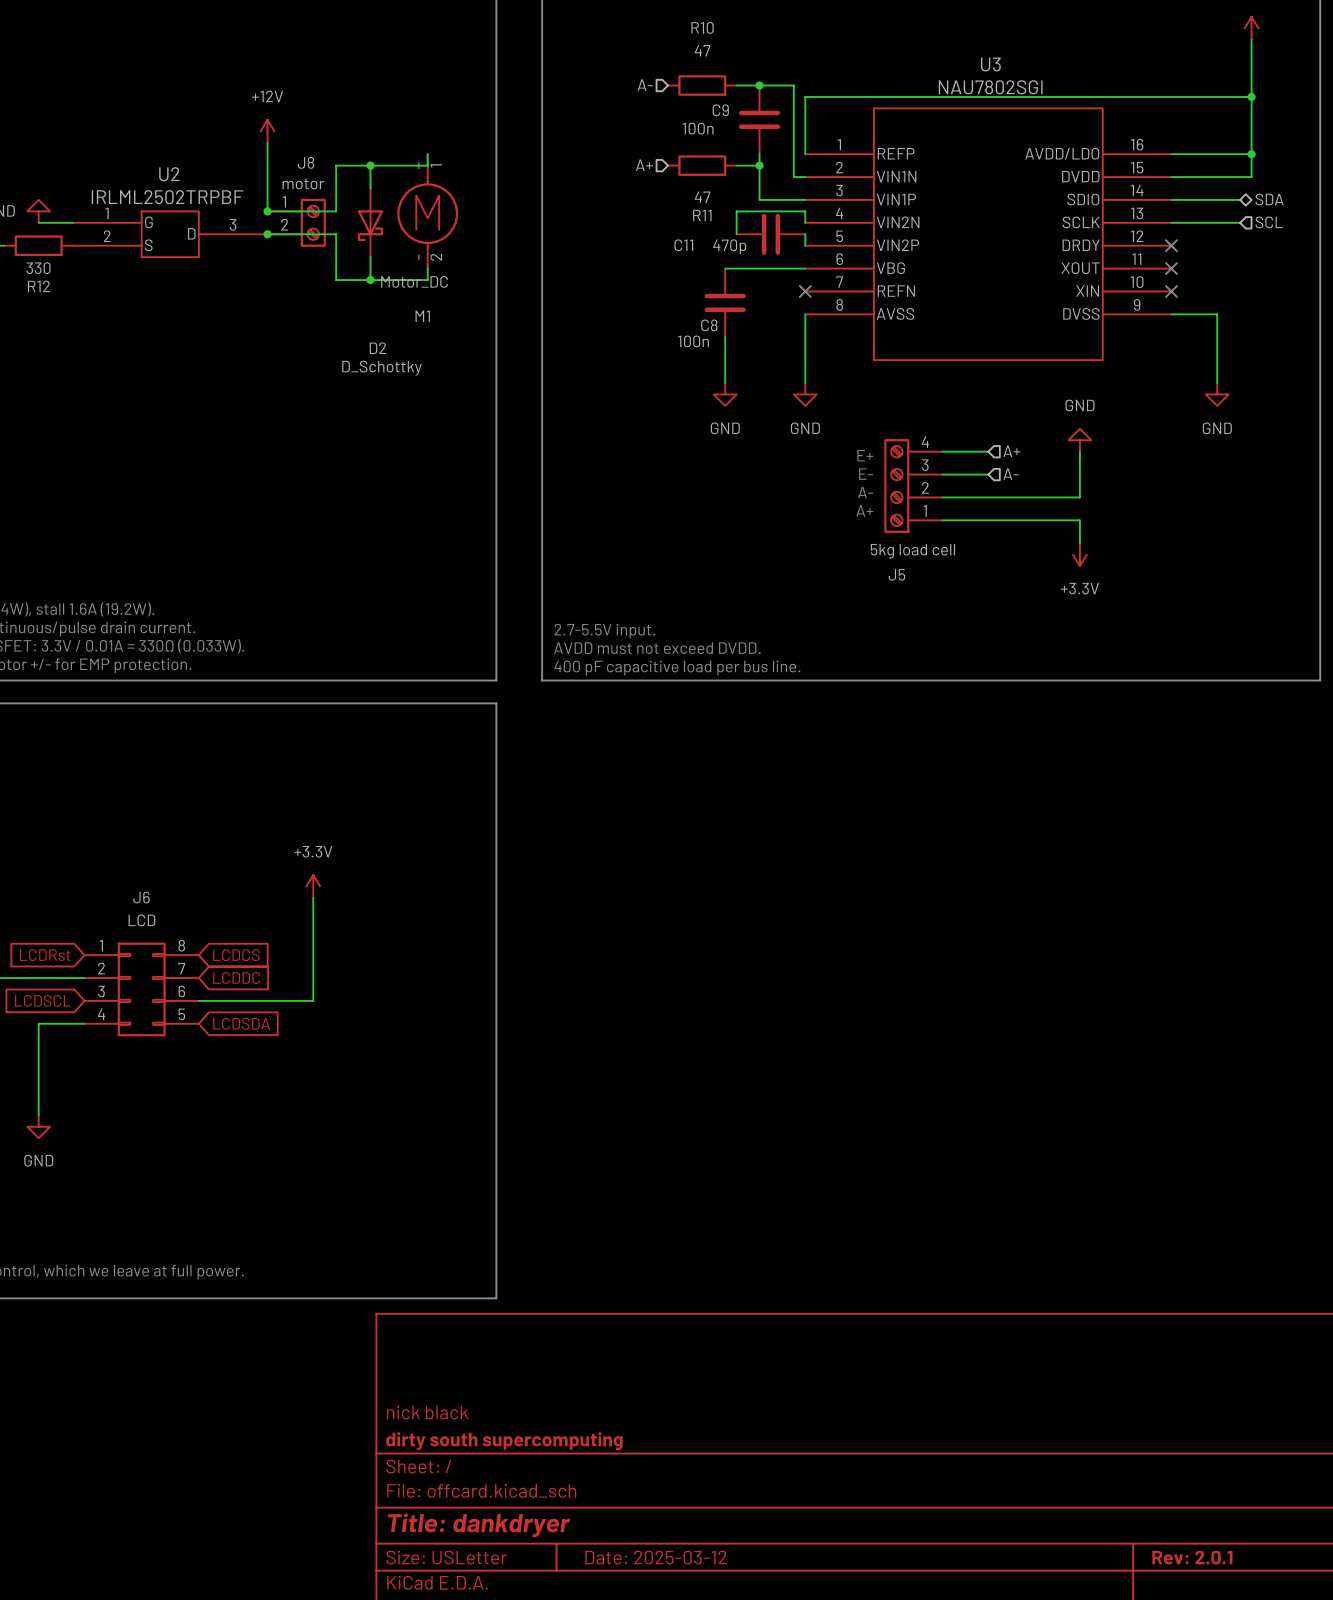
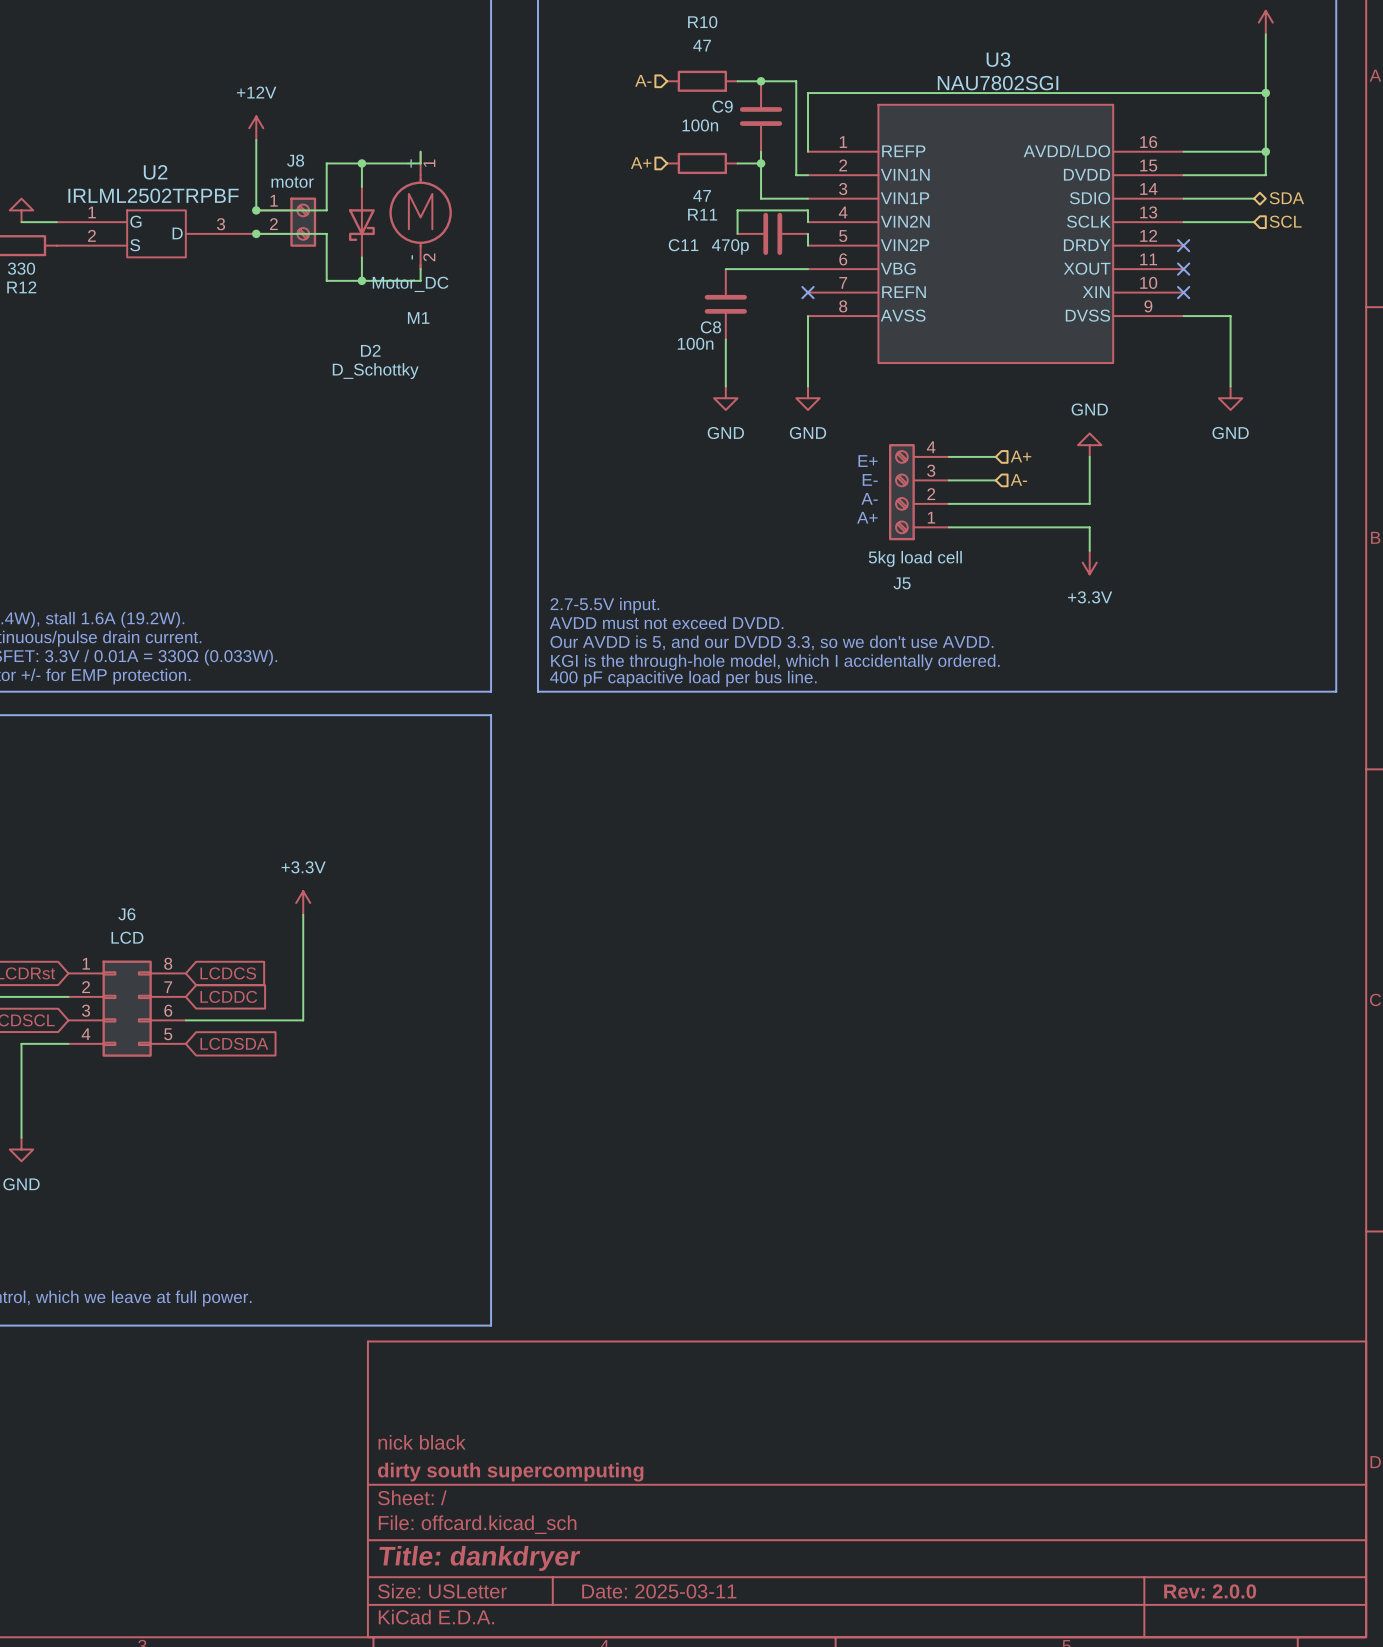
text: none -> 2.7-5.5V input. (604, 605)
text: none -> AVDD must not exceed DVDD. (666, 622)
text: 2.7-5.5V input. (604, 631) -> Our AVDD is 5, and our DVDD 3.3, so we don't use AVDD. (771, 642)
text: AVDD must not exceed DVDD. (657, 648) -> KGI is the through-hole model, which I accidentally ordered. (775, 662)
title block: Date: 2025-03-12 (656, 1557) -> Date: 2025-03-11 (659, 1591)
title block: Rev: 2.0.1 (1192, 1557) -> Rev: 2.0.0 (1210, 1591)

